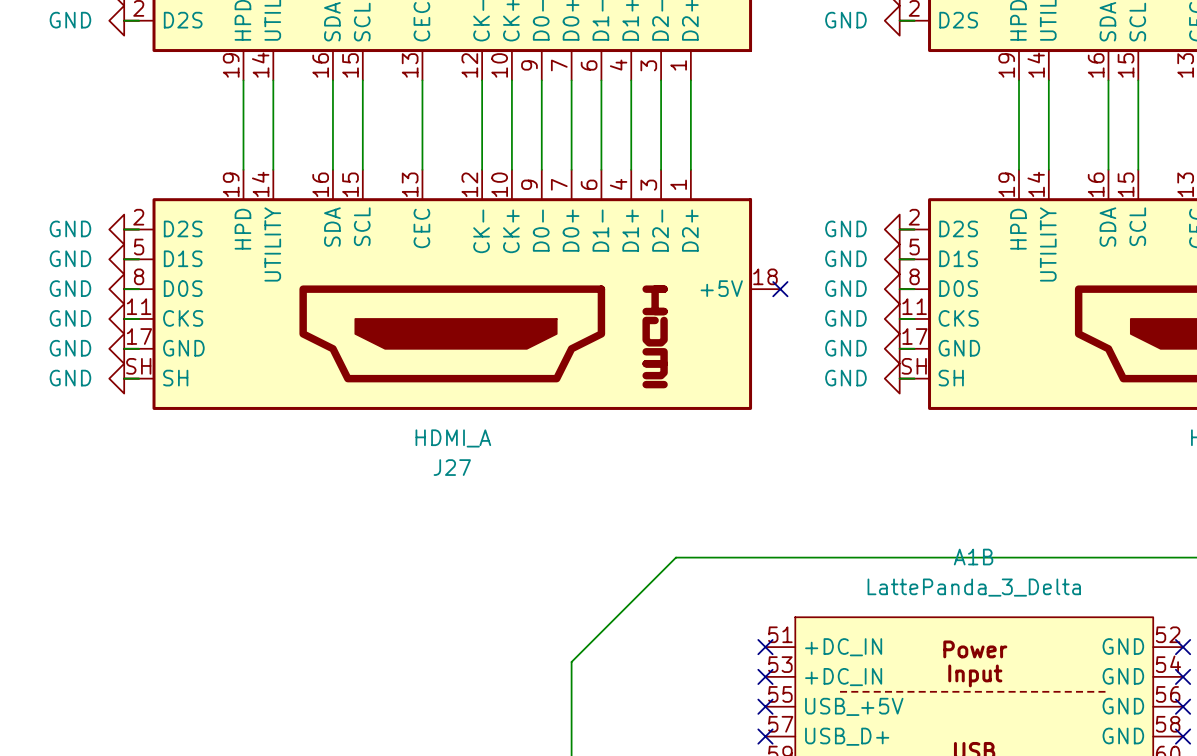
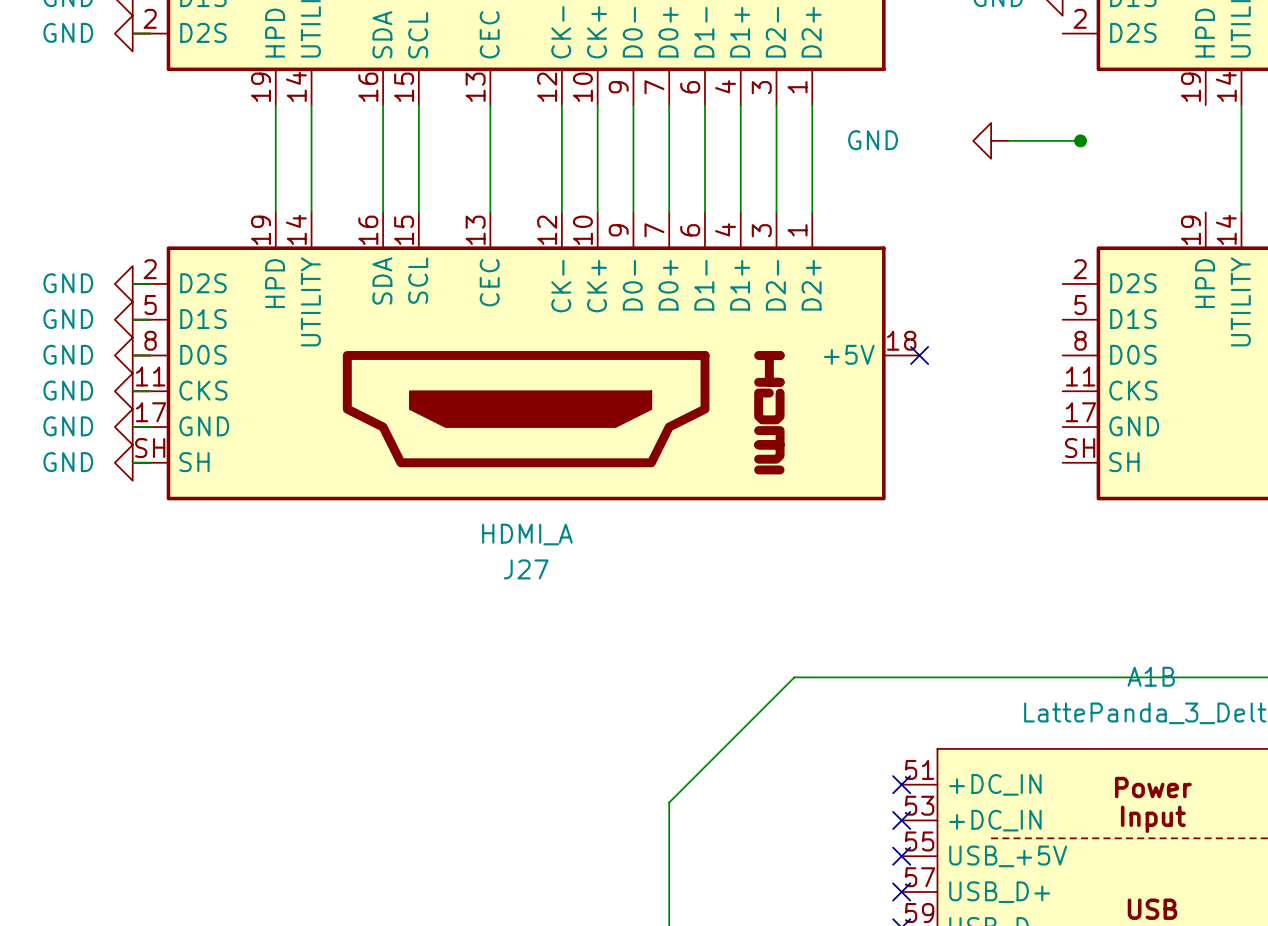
power symbol: GND (899, 20) -> none
wire: (1019, 80) (1019, 169) -> none
power symbol: none -> GND (991, 140)
wire: none -> (1009, 140) (1080, 140)
junction: none -> (1080, 140)
power symbol: GND (899, 229) -> none
power symbol: GND (899, 259) -> none
power symbol: GND (899, 289) -> none
power symbol: GND (899, 318) -> none
power symbol: GND (899, 348) -> none
power symbol: GND (899, 378) -> none

